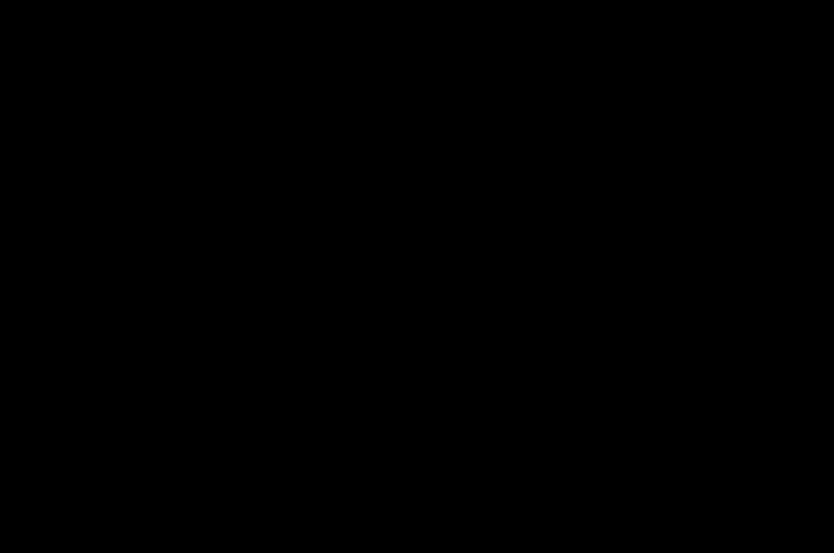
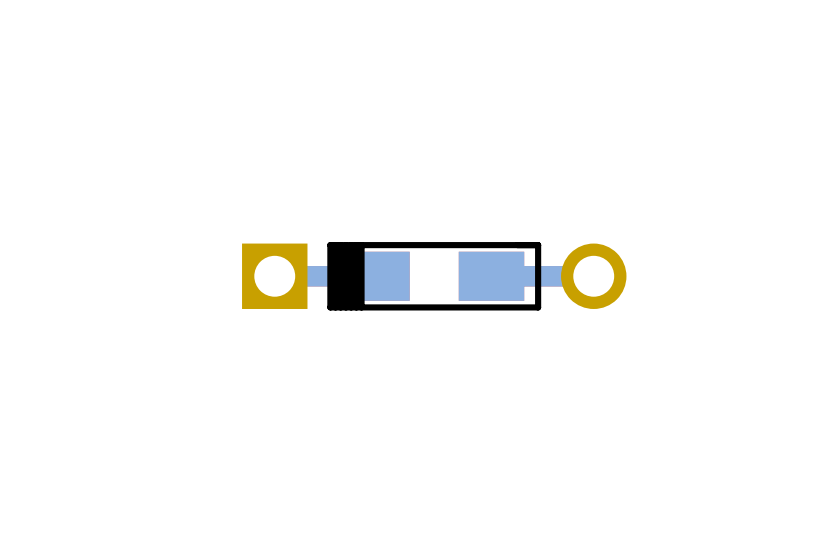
part: none -> (434, 276)

